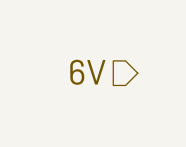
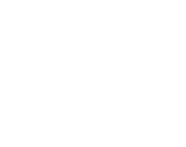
hierarchical label: 6V (87, 72) -> none

